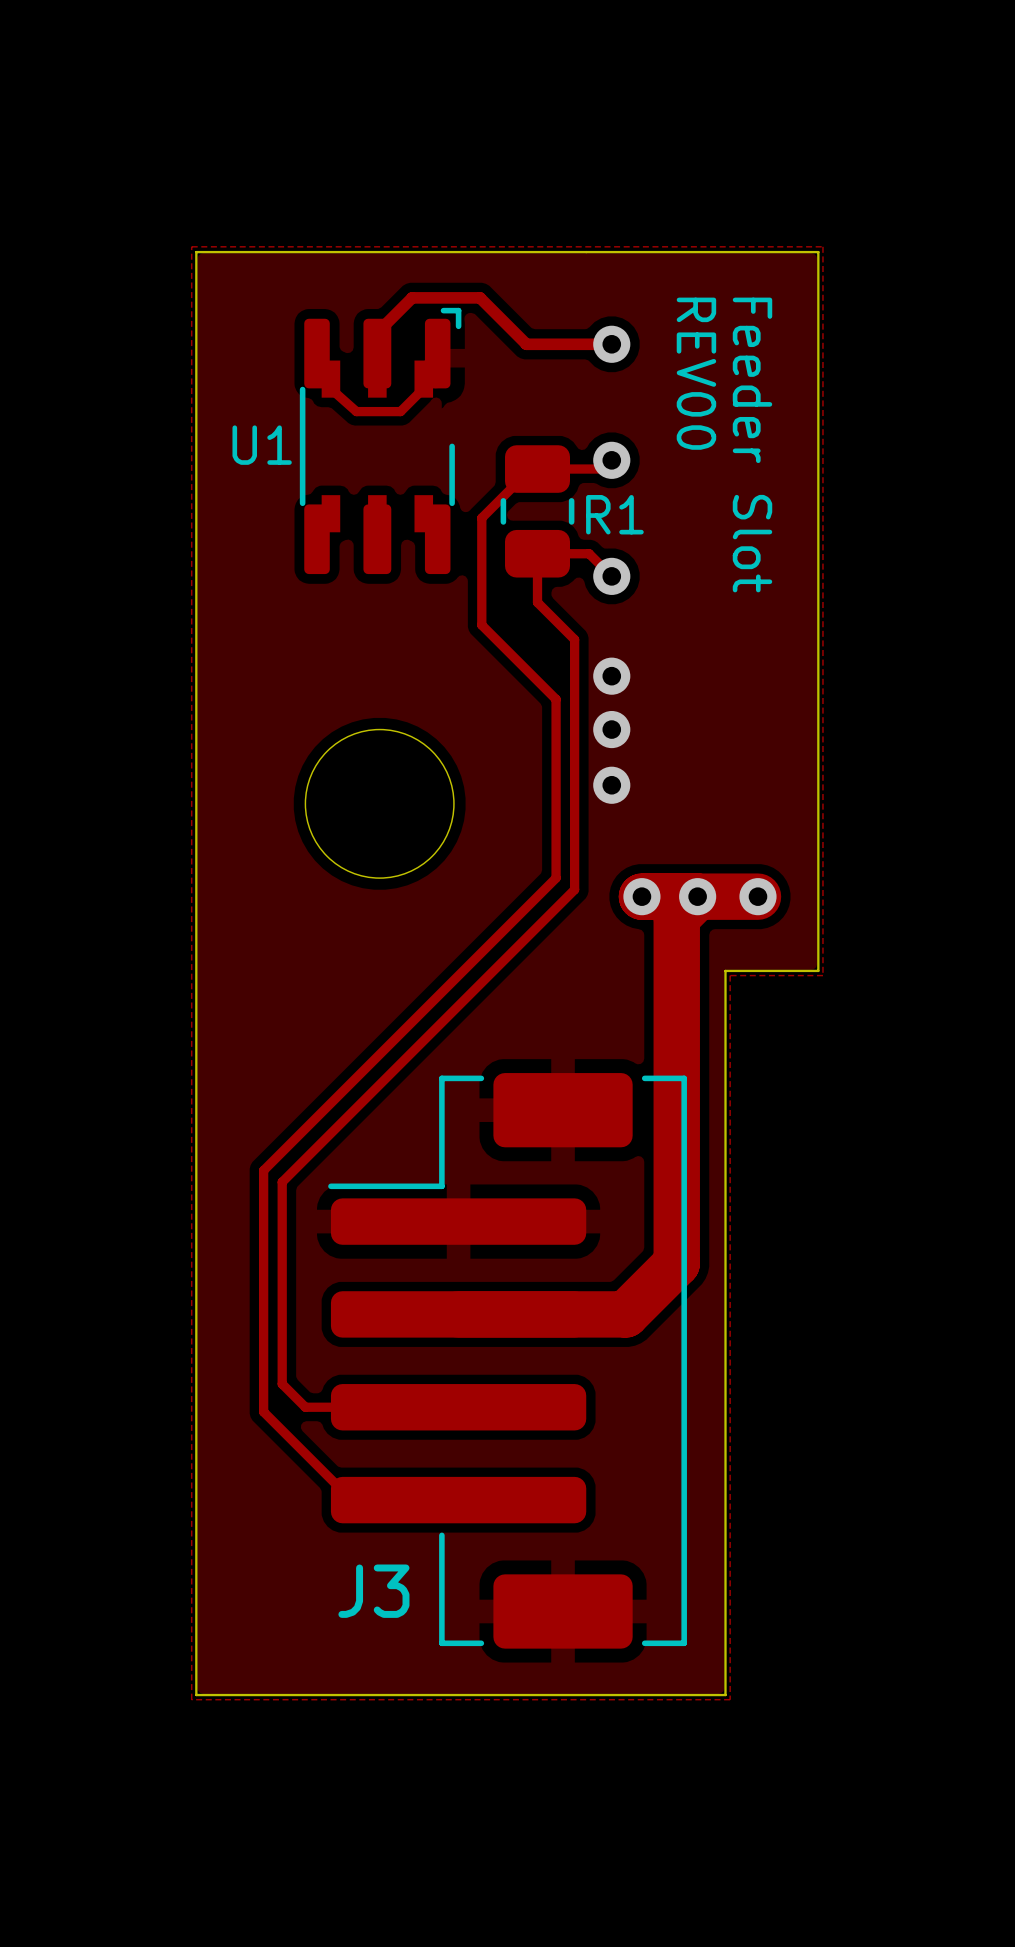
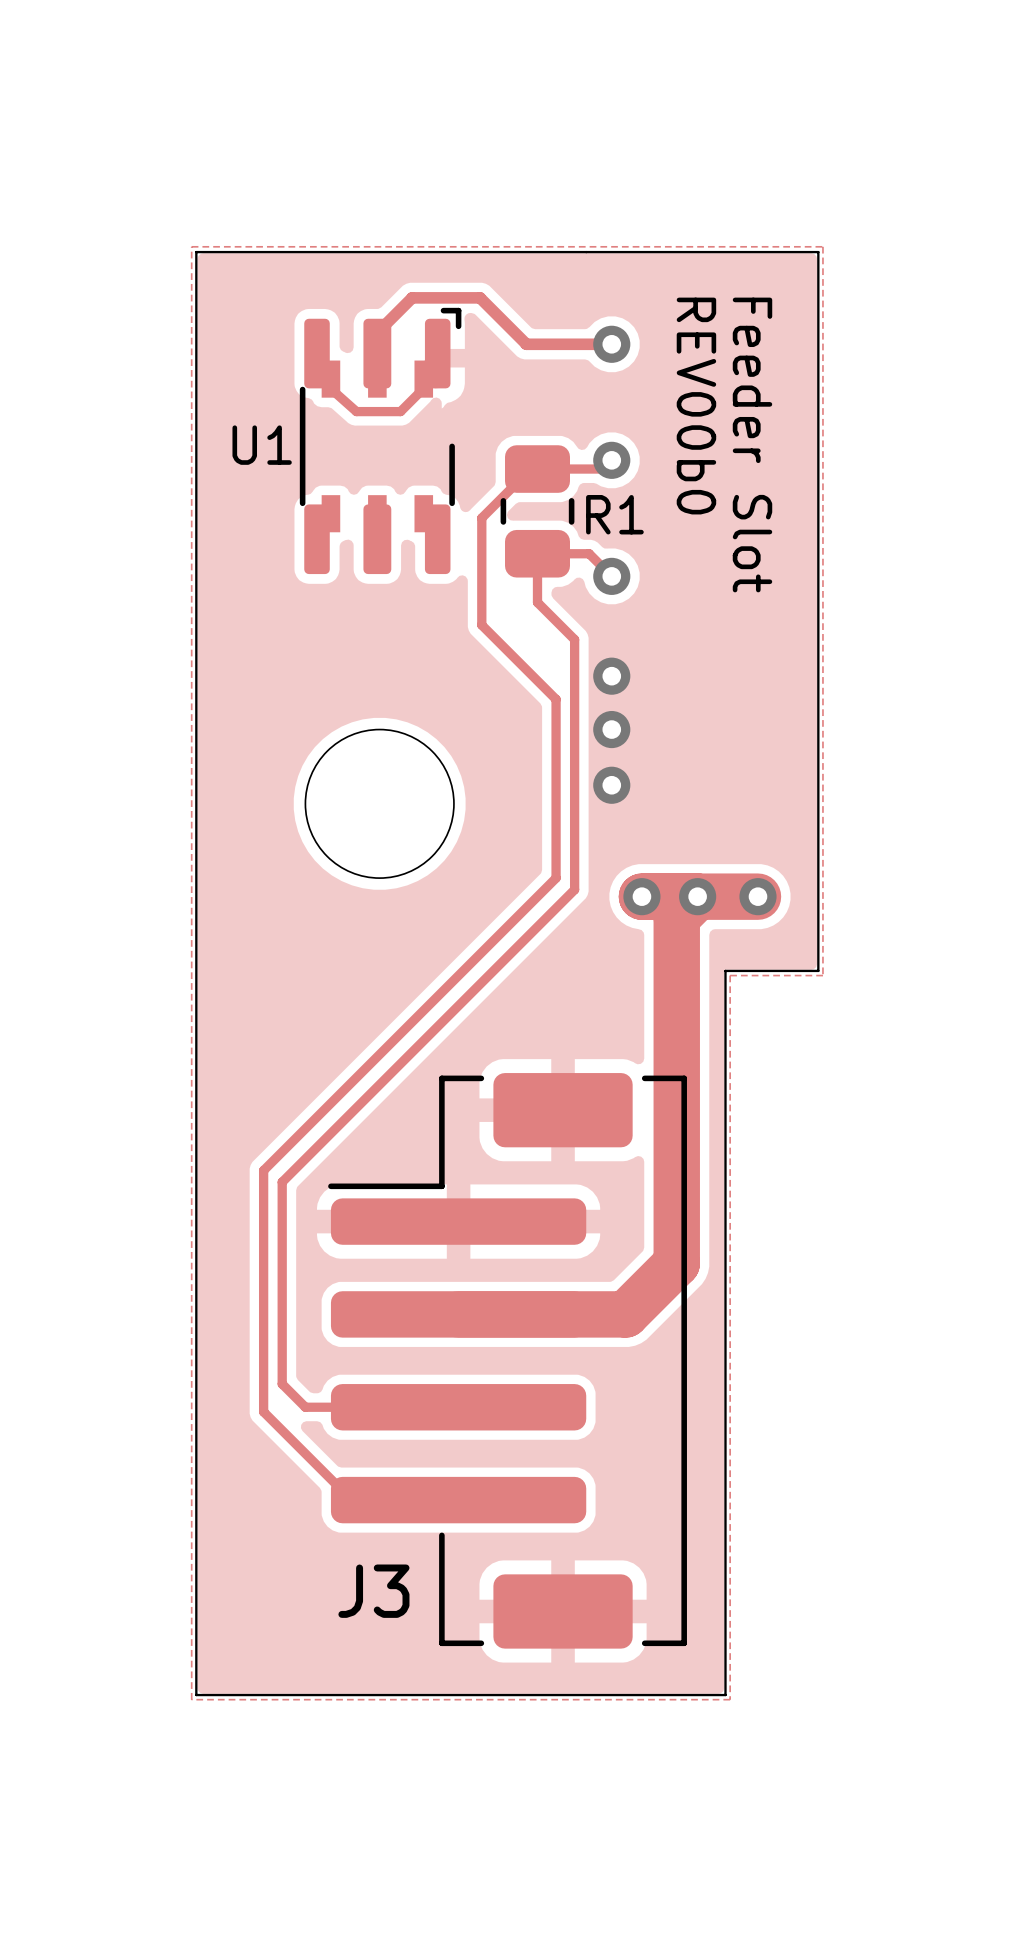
text: REV00 (696, 373) -> REV00b0 (696, 406)

